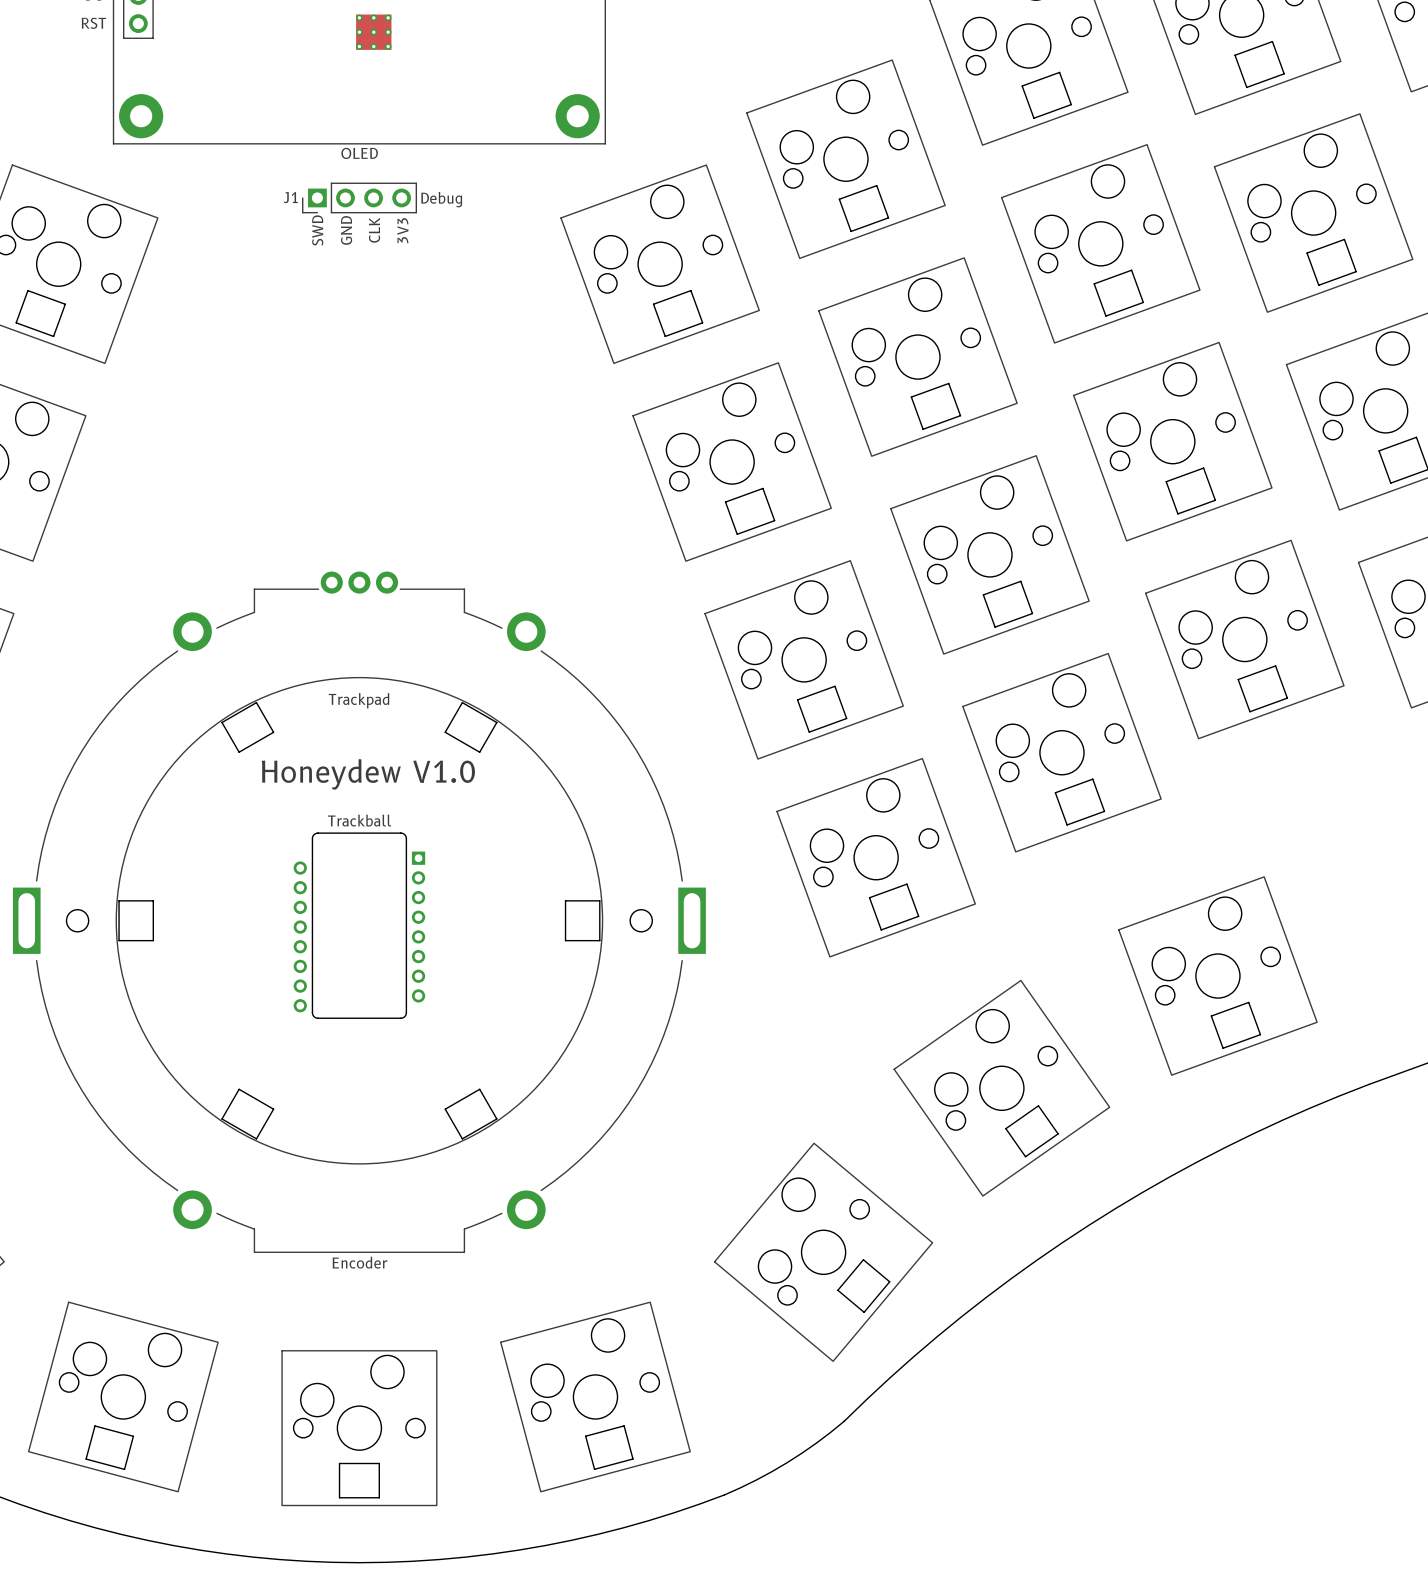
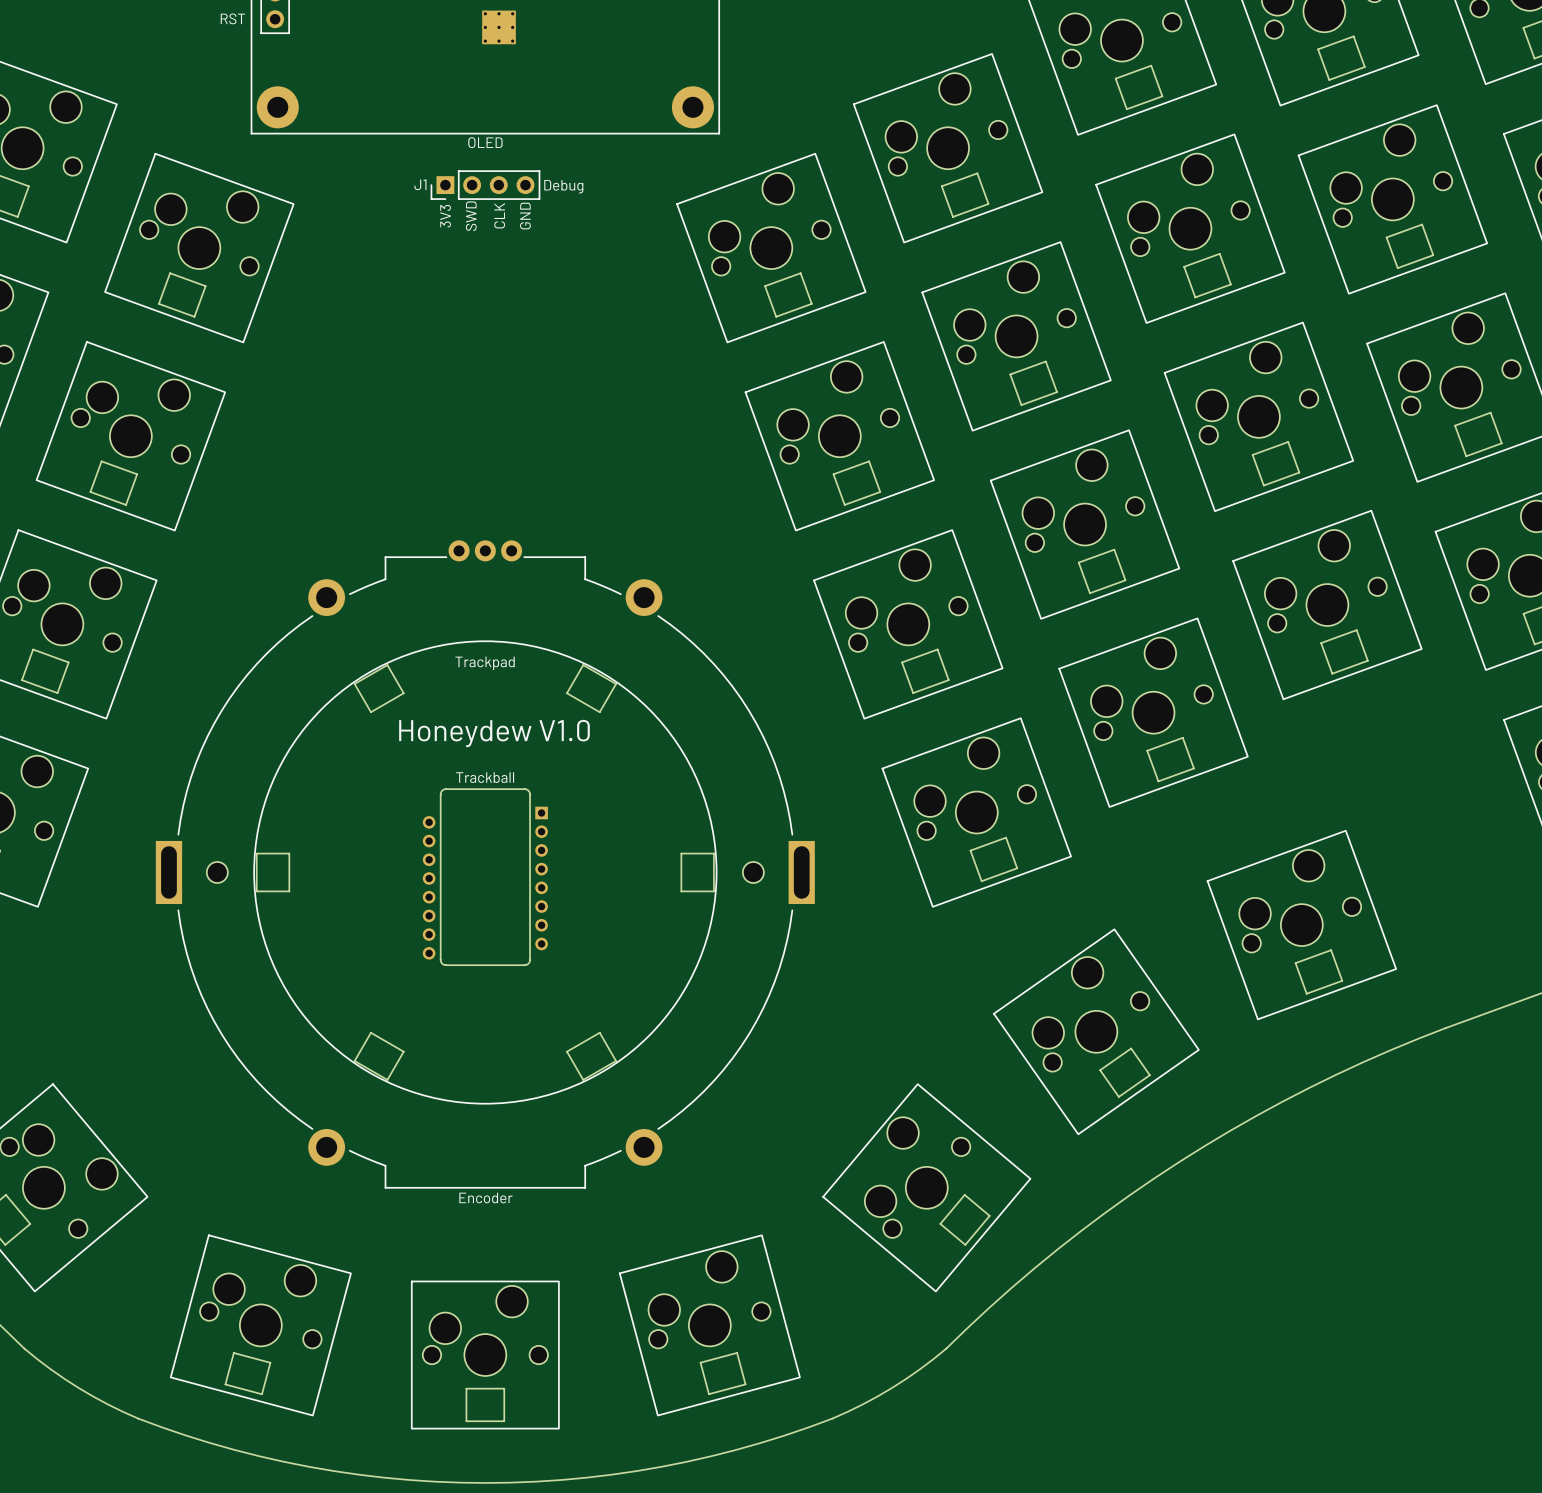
text: SWD (317, 230) -> 3V3 (445, 216)
text: GND (346, 230) -> SWD (471, 216)
text: 3V3 (402, 230) -> GND (525, 216)

